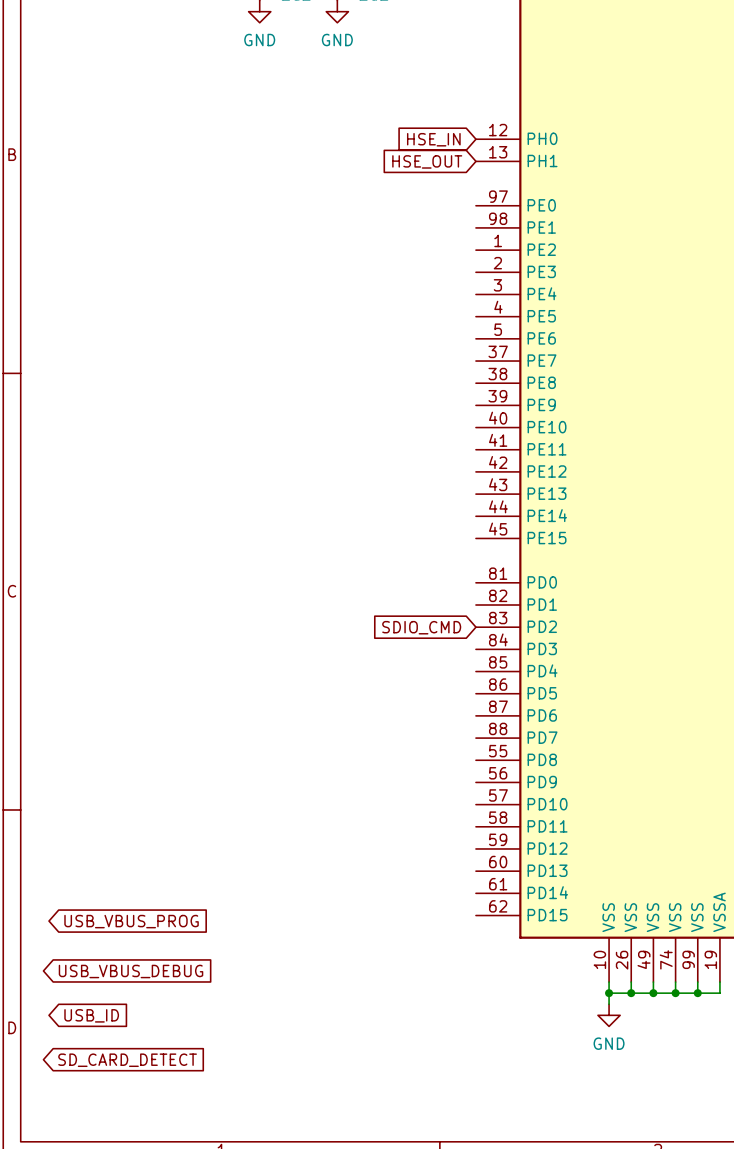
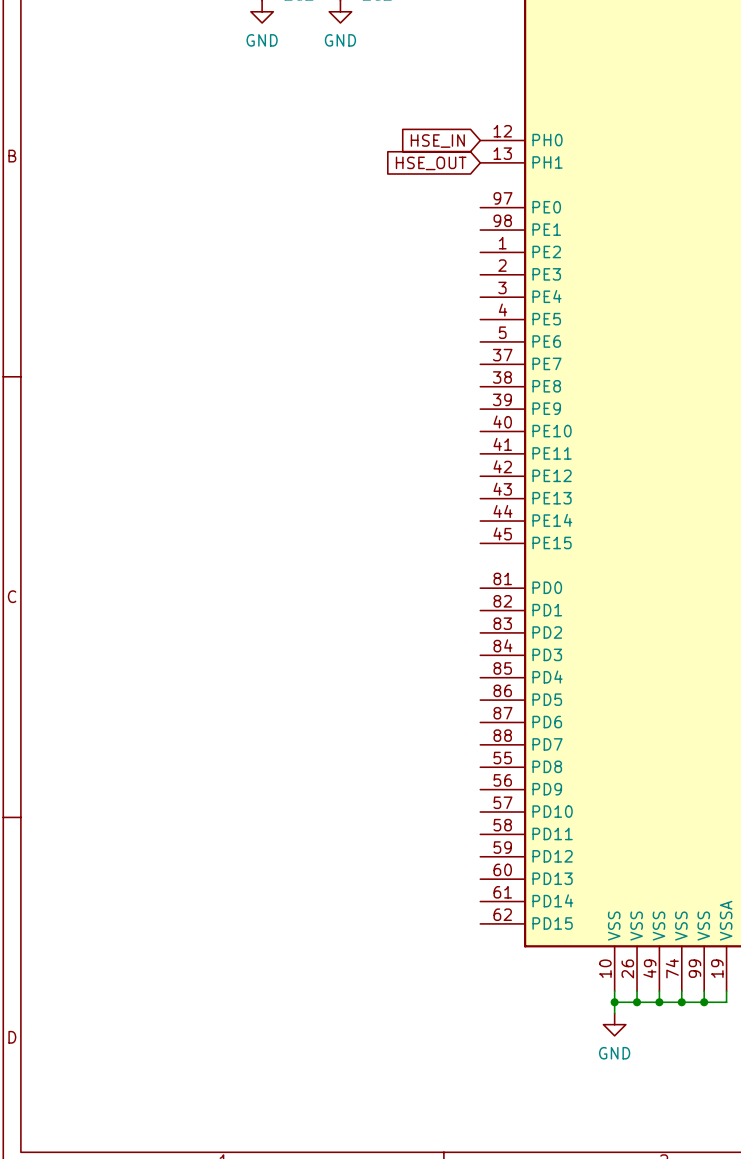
global label: SDIO_CMD (421, 627) -> none
global label: USB_VBUS_PROG (131, 921) -> none
global label: USB_VBUS_DEBUG (131, 971) -> none
global label: USB_ID (91, 1015) -> none
global label: SD_CARD_DETECT (127, 1060) -> none

